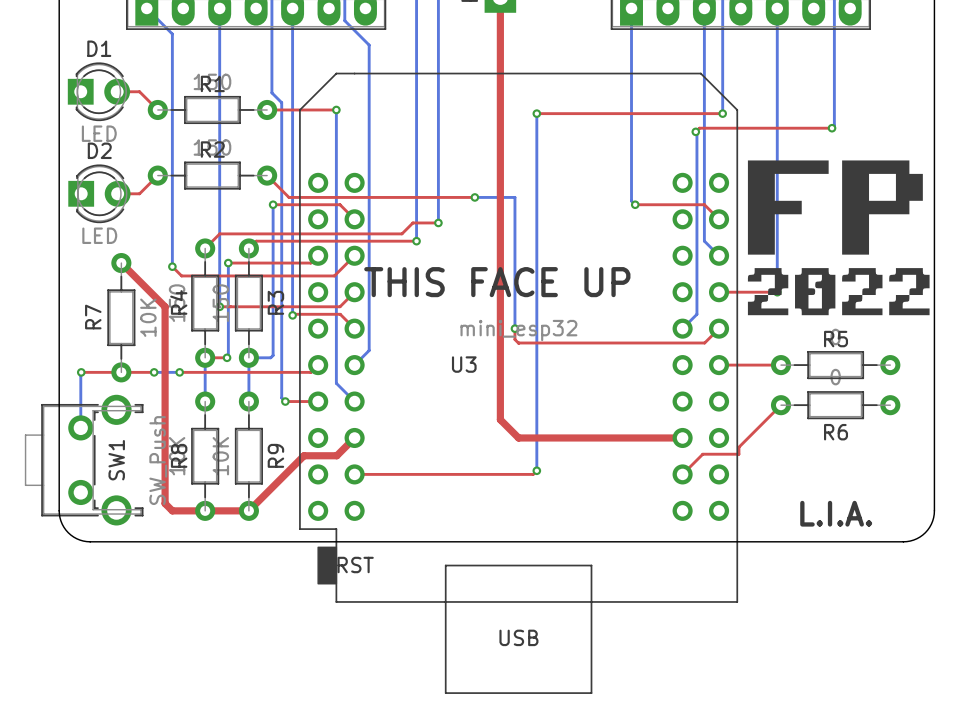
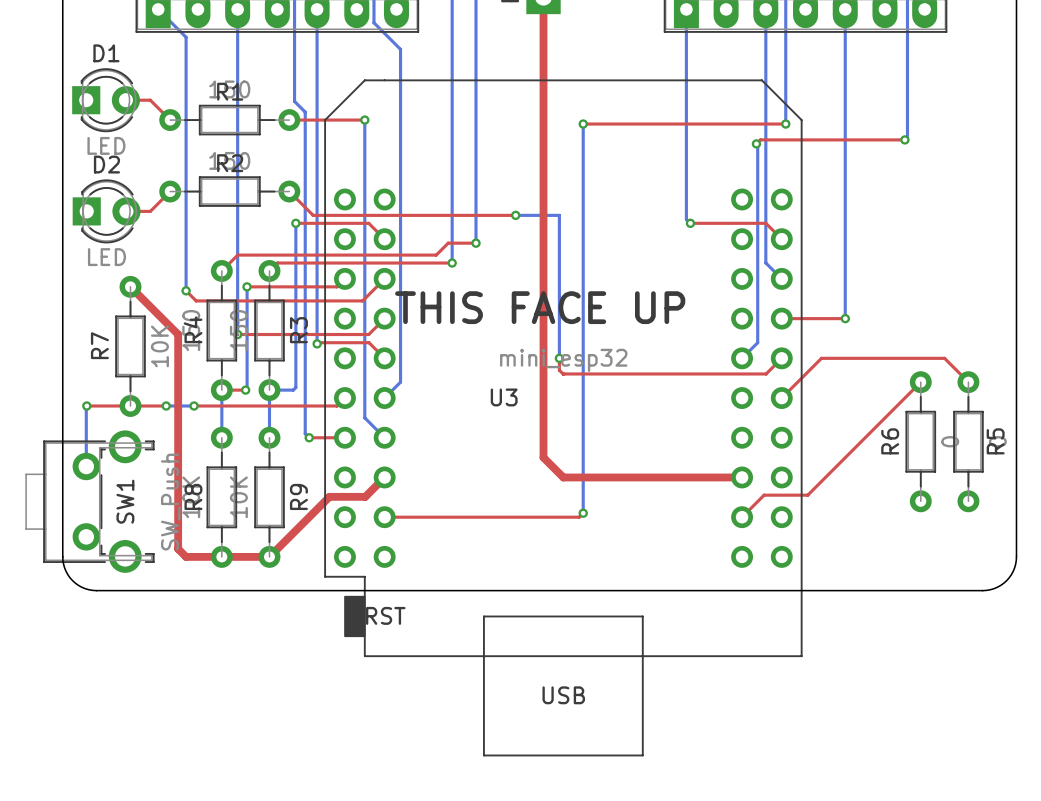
drawing: [747, 160, 930, 316] -> none
top track: (719, 365) (781, 365) -> (781, 398) (821, 358) (944, 358) (968, 382)
R5 rotation: 0° (835, 365) -> 90° clockwise (968, 441)
top track: (781, 405) (738, 447) (738, 454) -> (920, 382) (807, 495) (803, 495)
R6 rotation: 0° (835, 405) -> 90° clockwise (920, 441)
text: L.I.A. (836, 513) -> none

